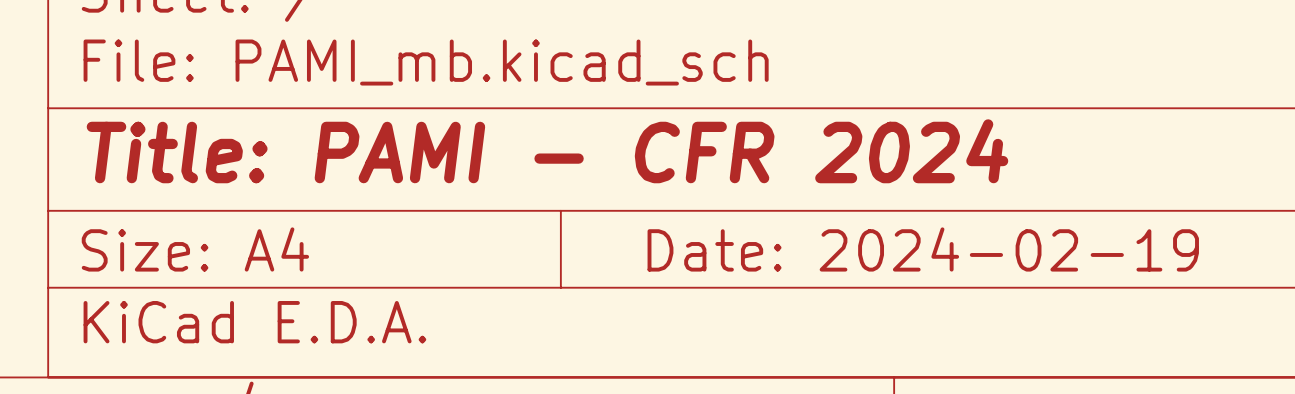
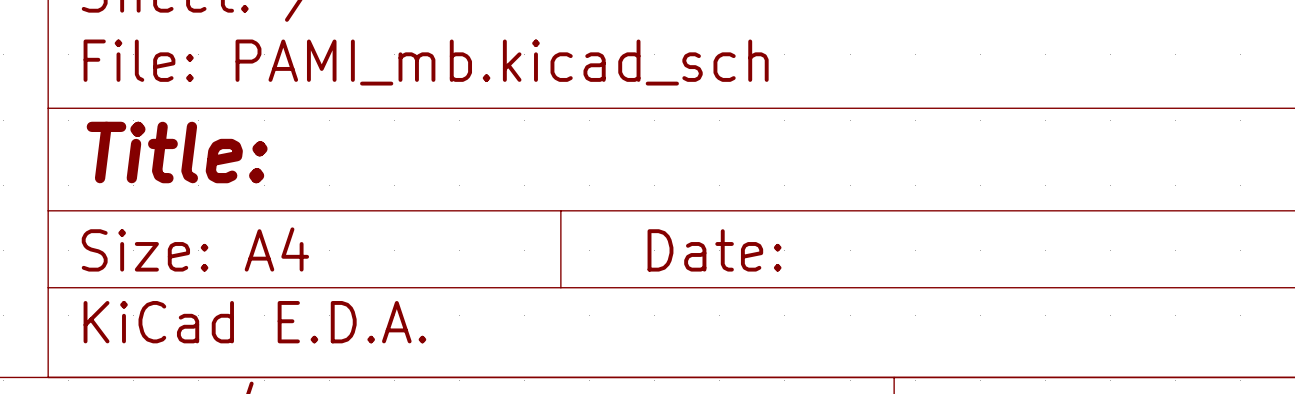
title block: Title: PAMI - CFR 2024 (547, 151) -> Title: (177, 152)
title block: Date: 2024-02-19 (923, 249) -> Date: (714, 250)

